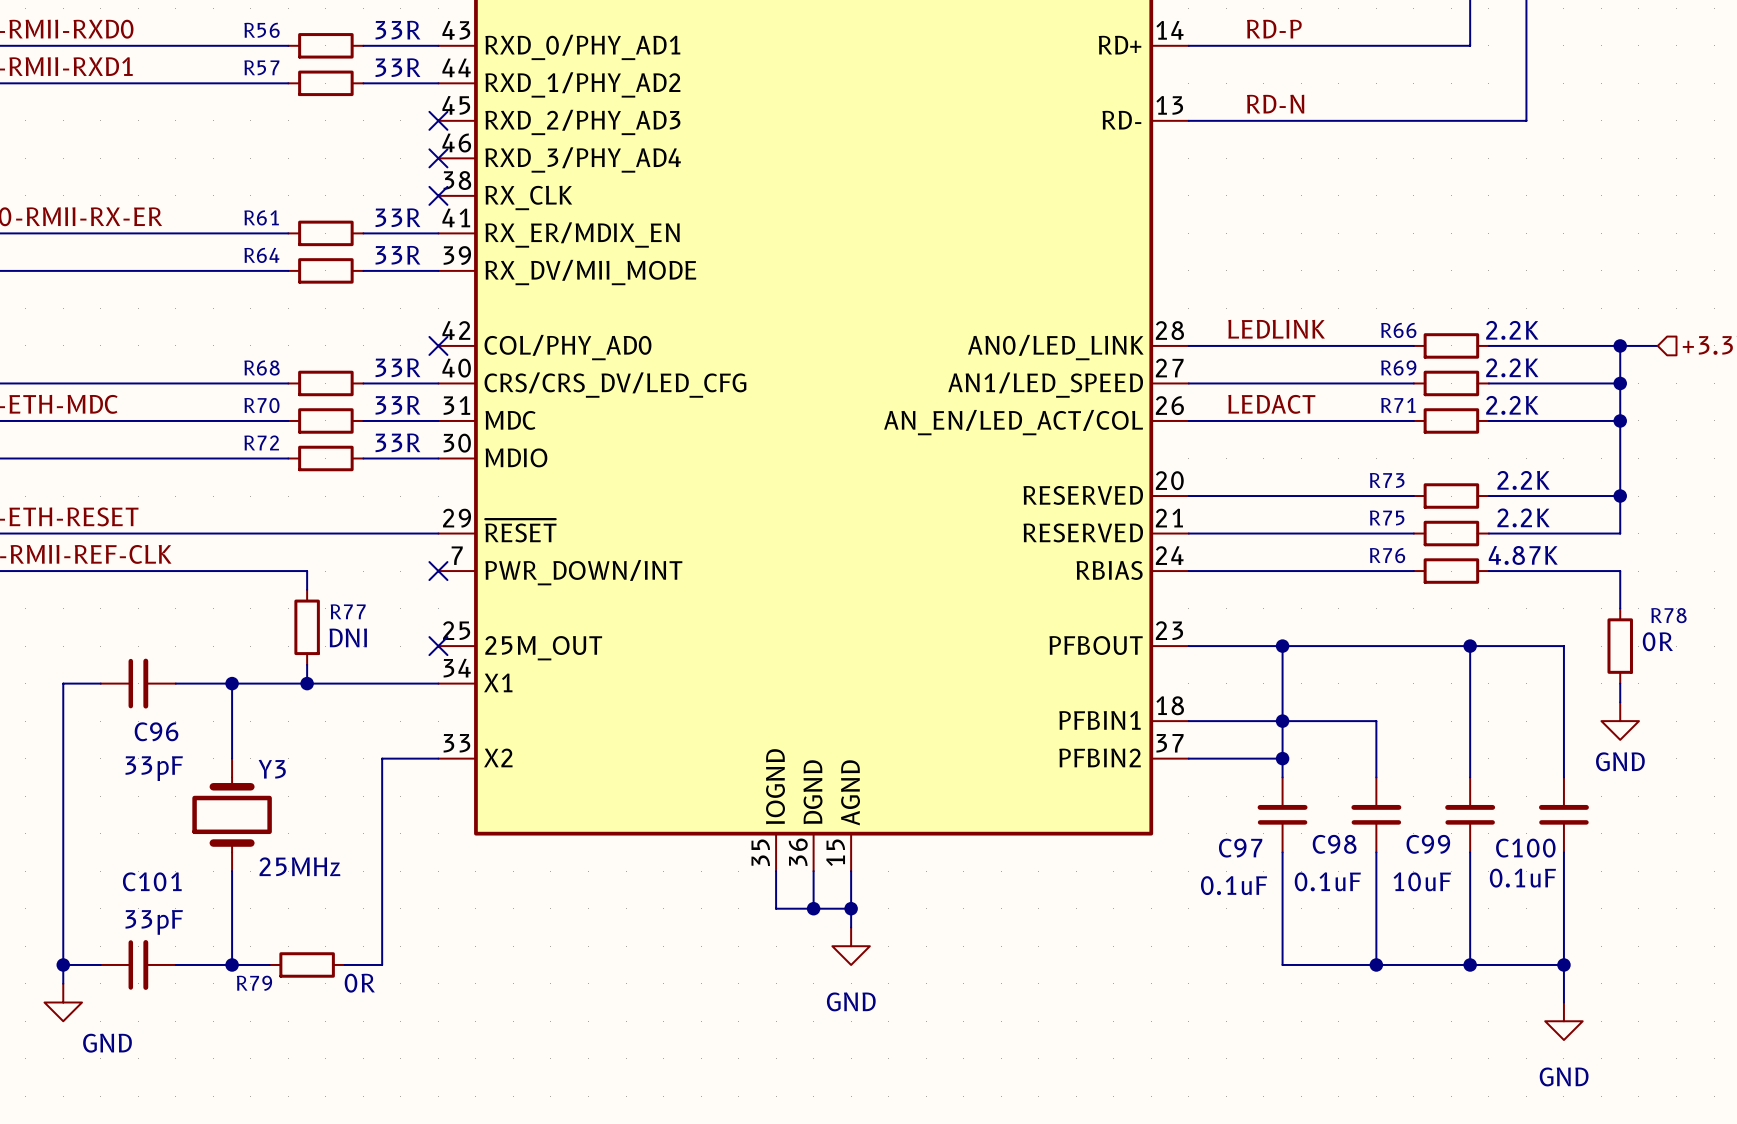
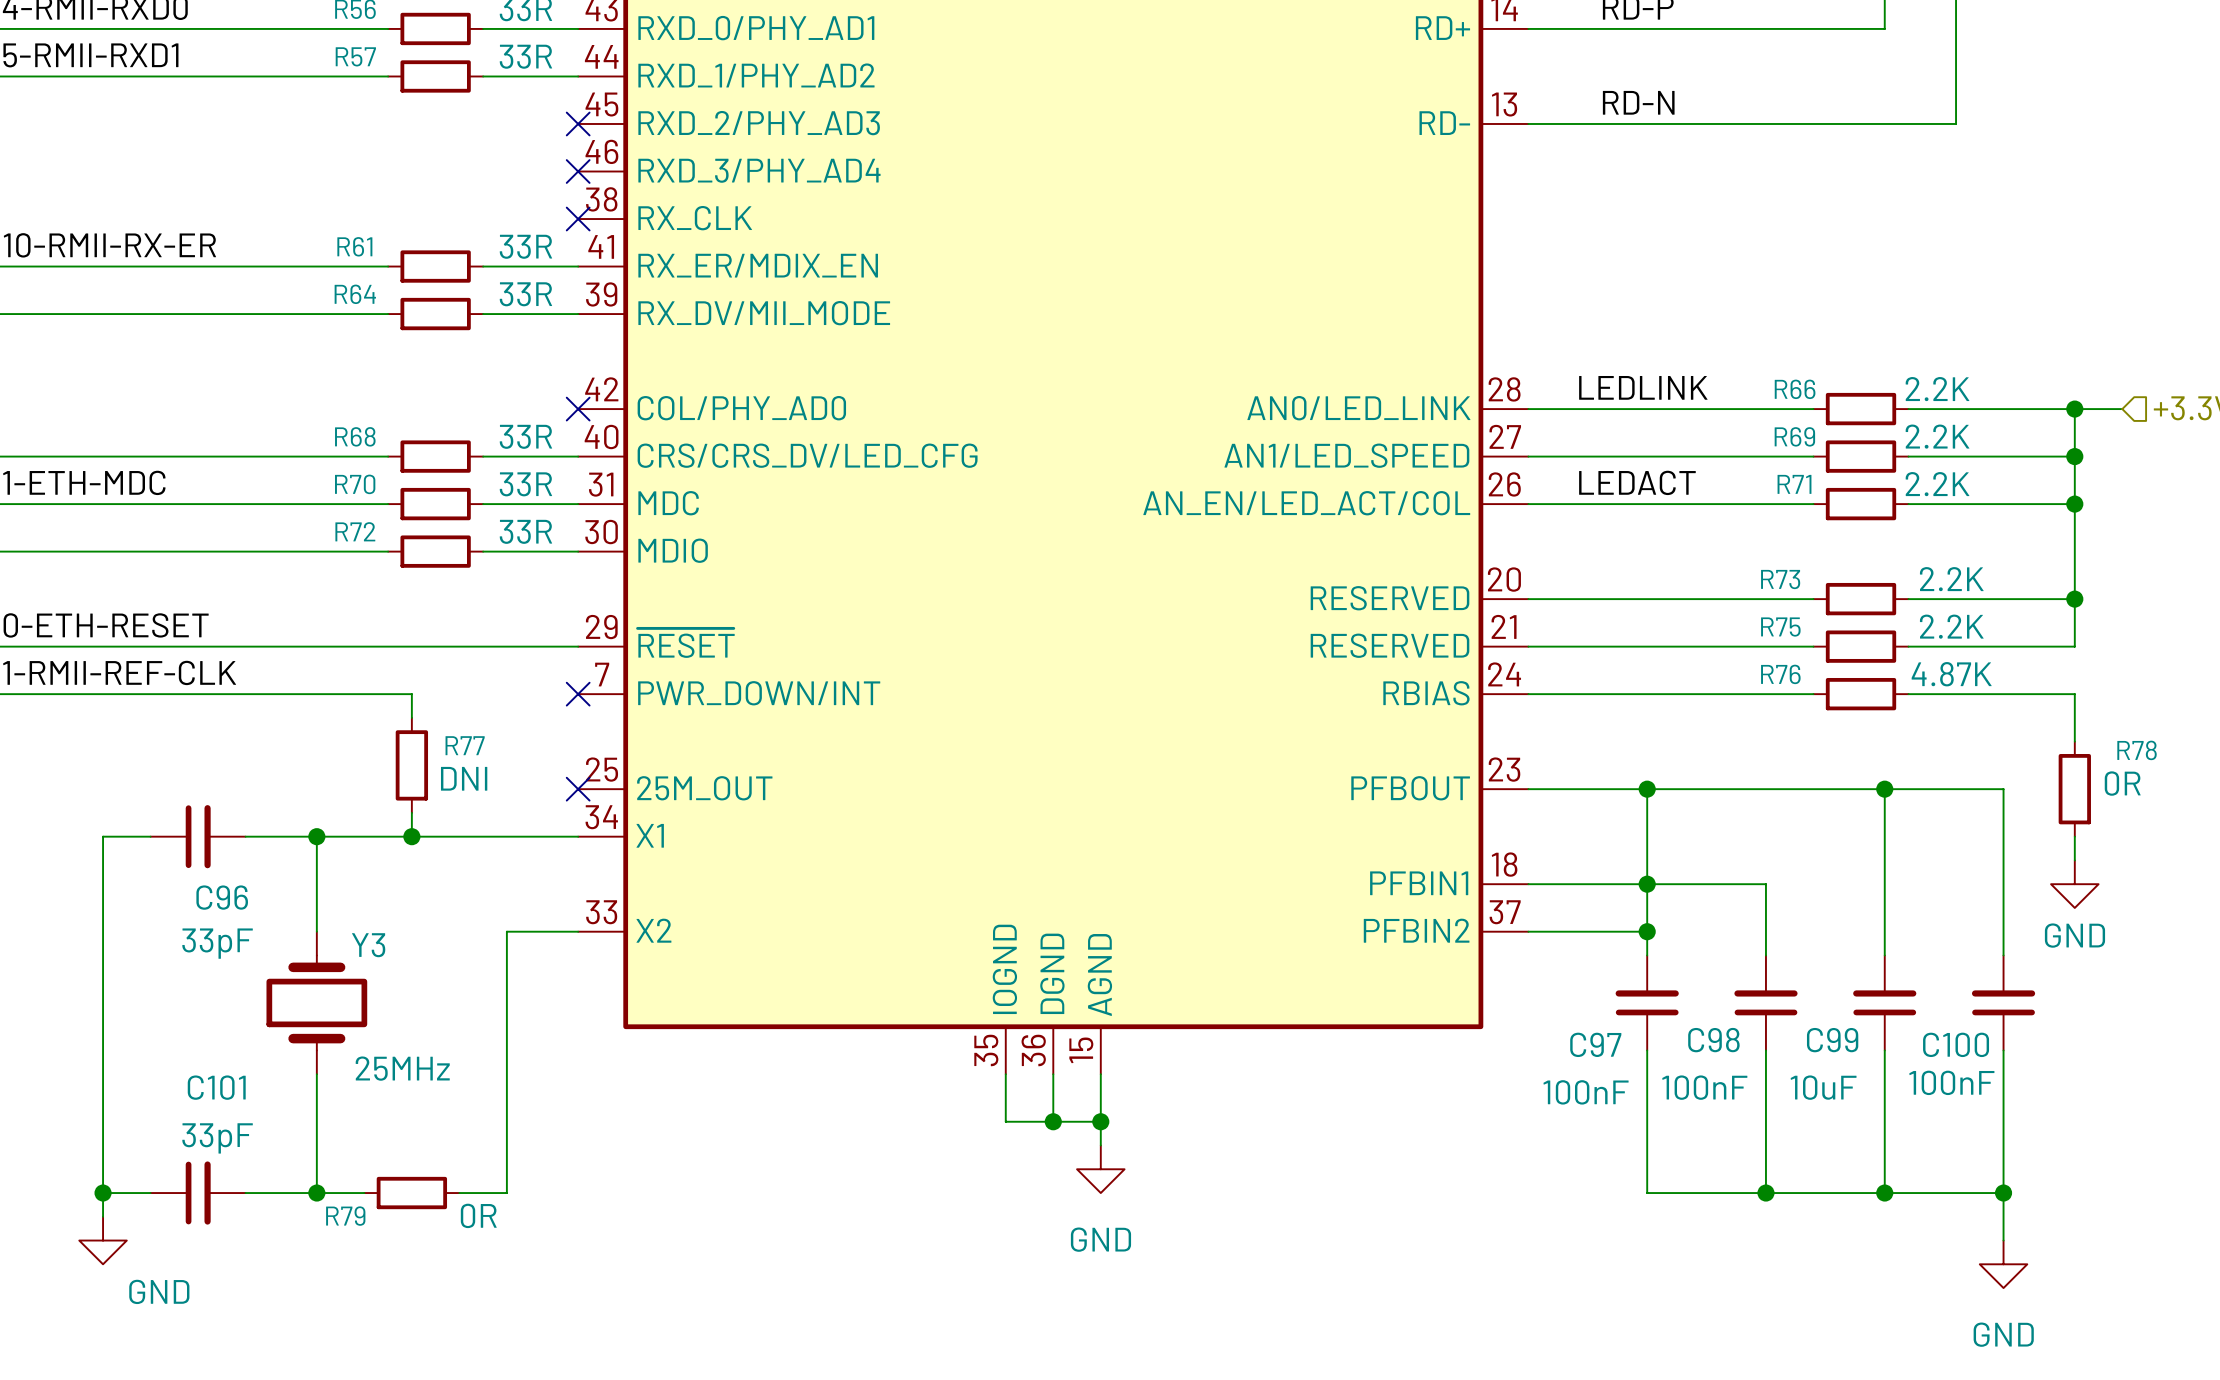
C100 value: 0.1uF (1522, 878) -> 100nF (1951, 1082)
C98 value: 0.1uF (1327, 881) -> 100nF (1704, 1087)
C97 value: 0.1uF (1234, 885) -> 100nF (1586, 1092)

